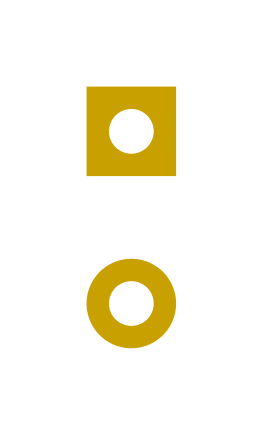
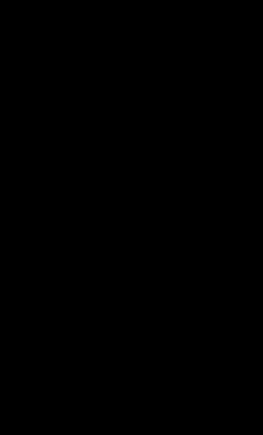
part: (131, 217) -> none

